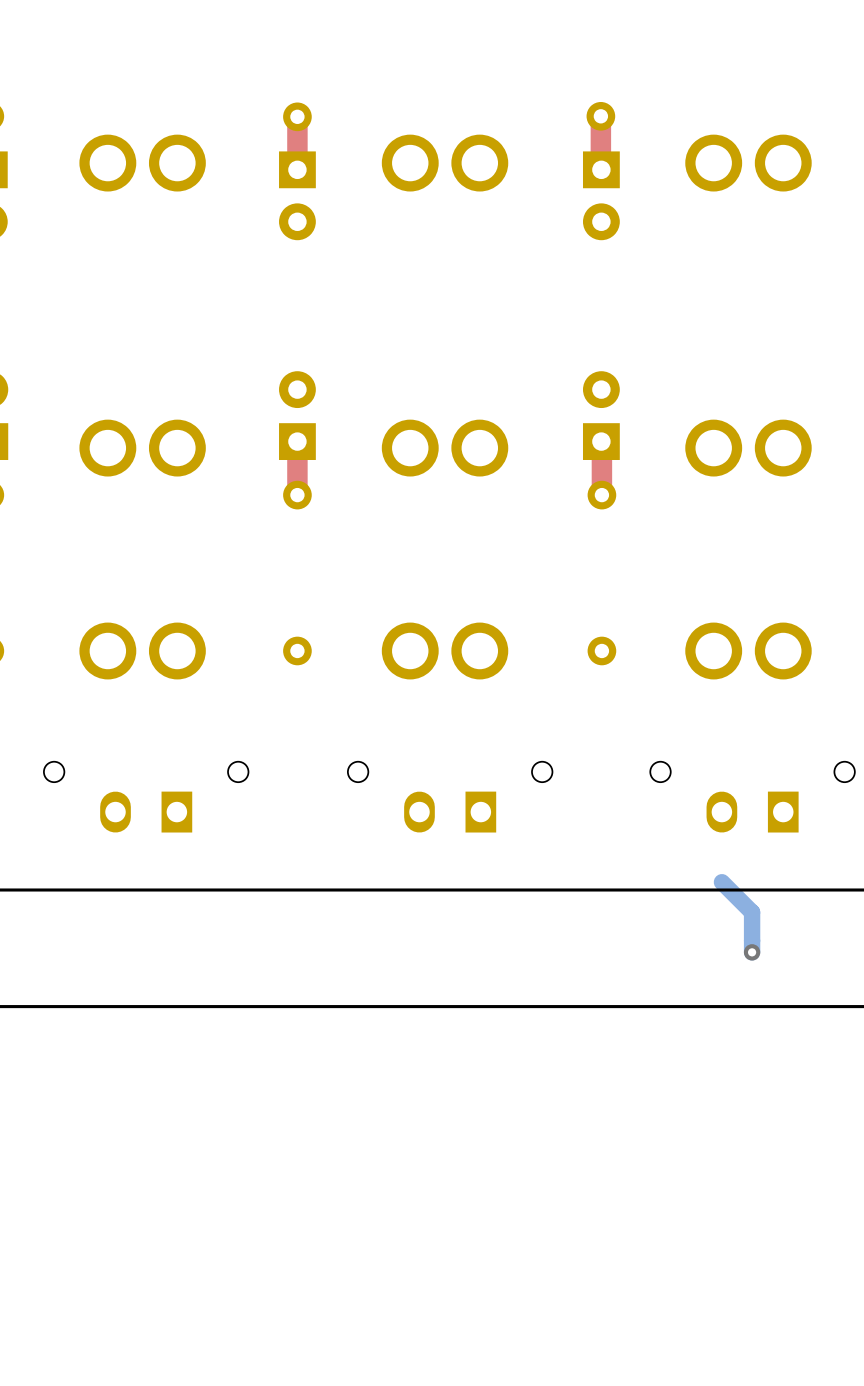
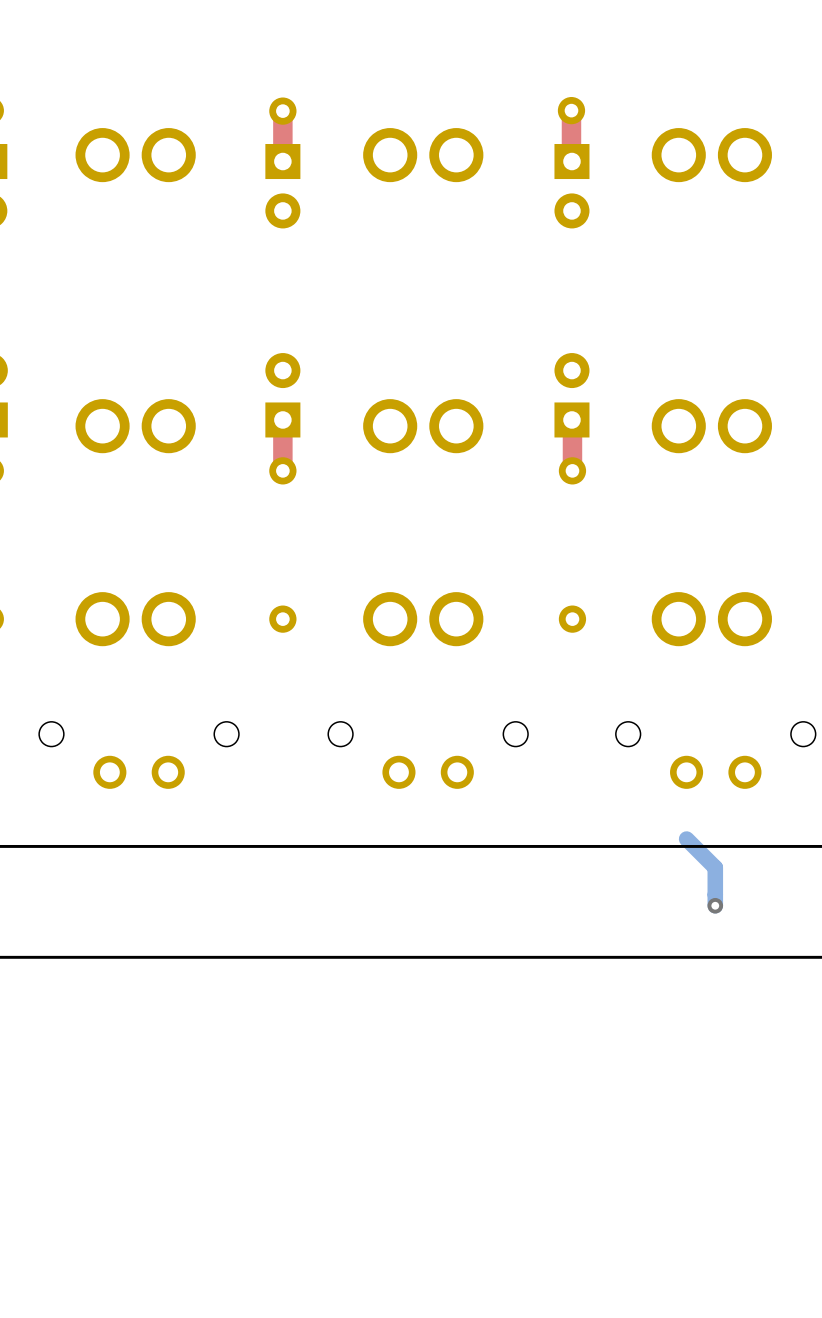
part footprint: [43, 761, 249, 833] -> [39, 721, 239, 789]
part footprint: [347, 761, 553, 833] -> [328, 721, 529, 789]
part footprint: [650, 761, 855, 833] -> [615, 721, 816, 789]

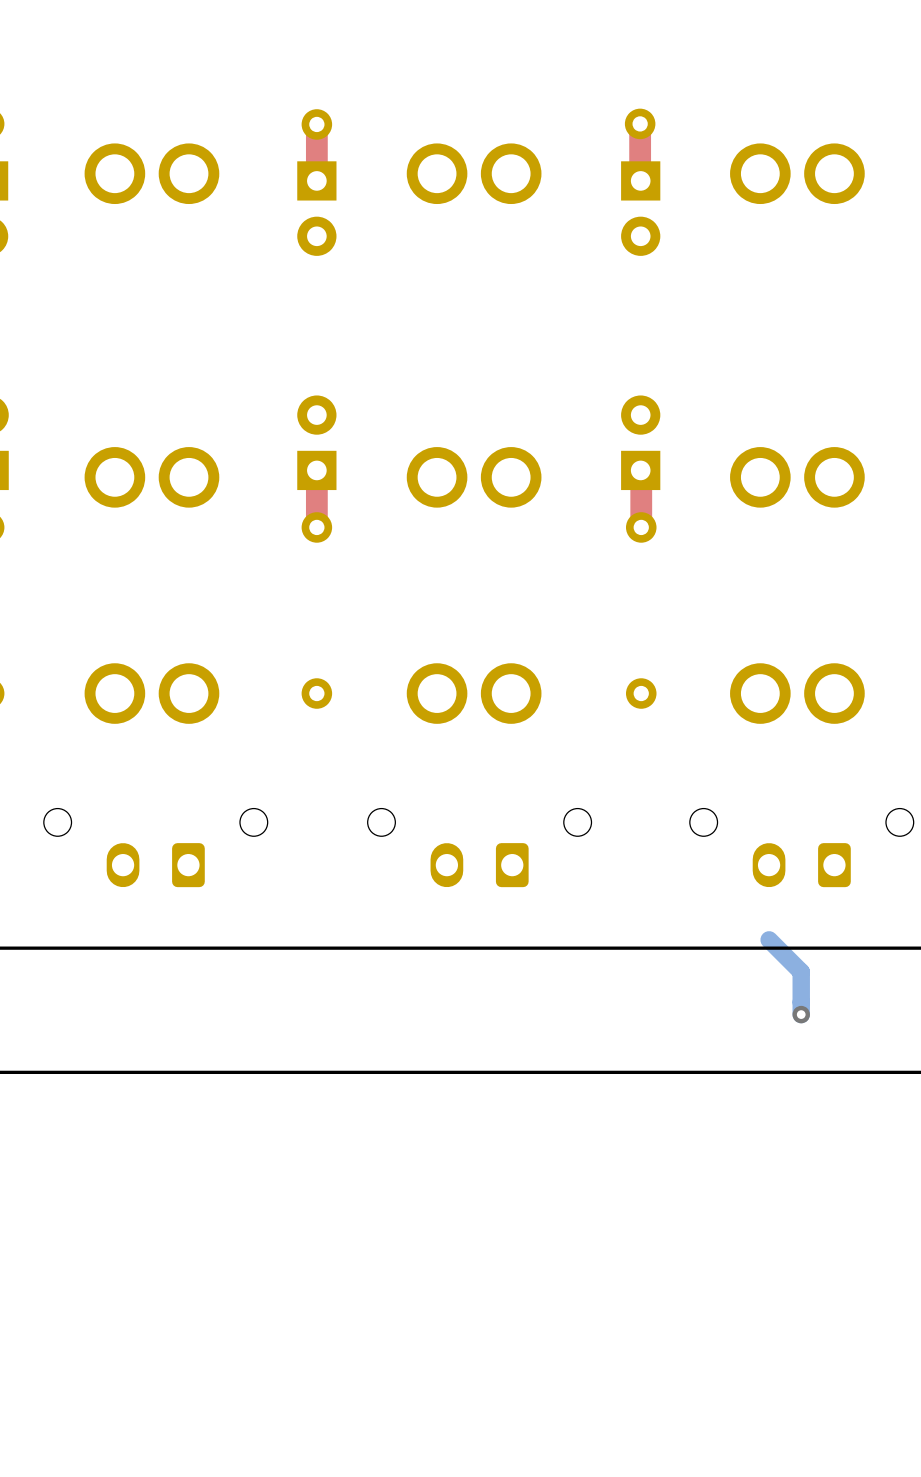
part footprint: [39, 721, 239, 789] -> [43, 808, 268, 888]
part footprint: [328, 721, 529, 789] -> [367, 808, 592, 888]
part footprint: [615, 721, 816, 789] -> [689, 808, 914, 888]

